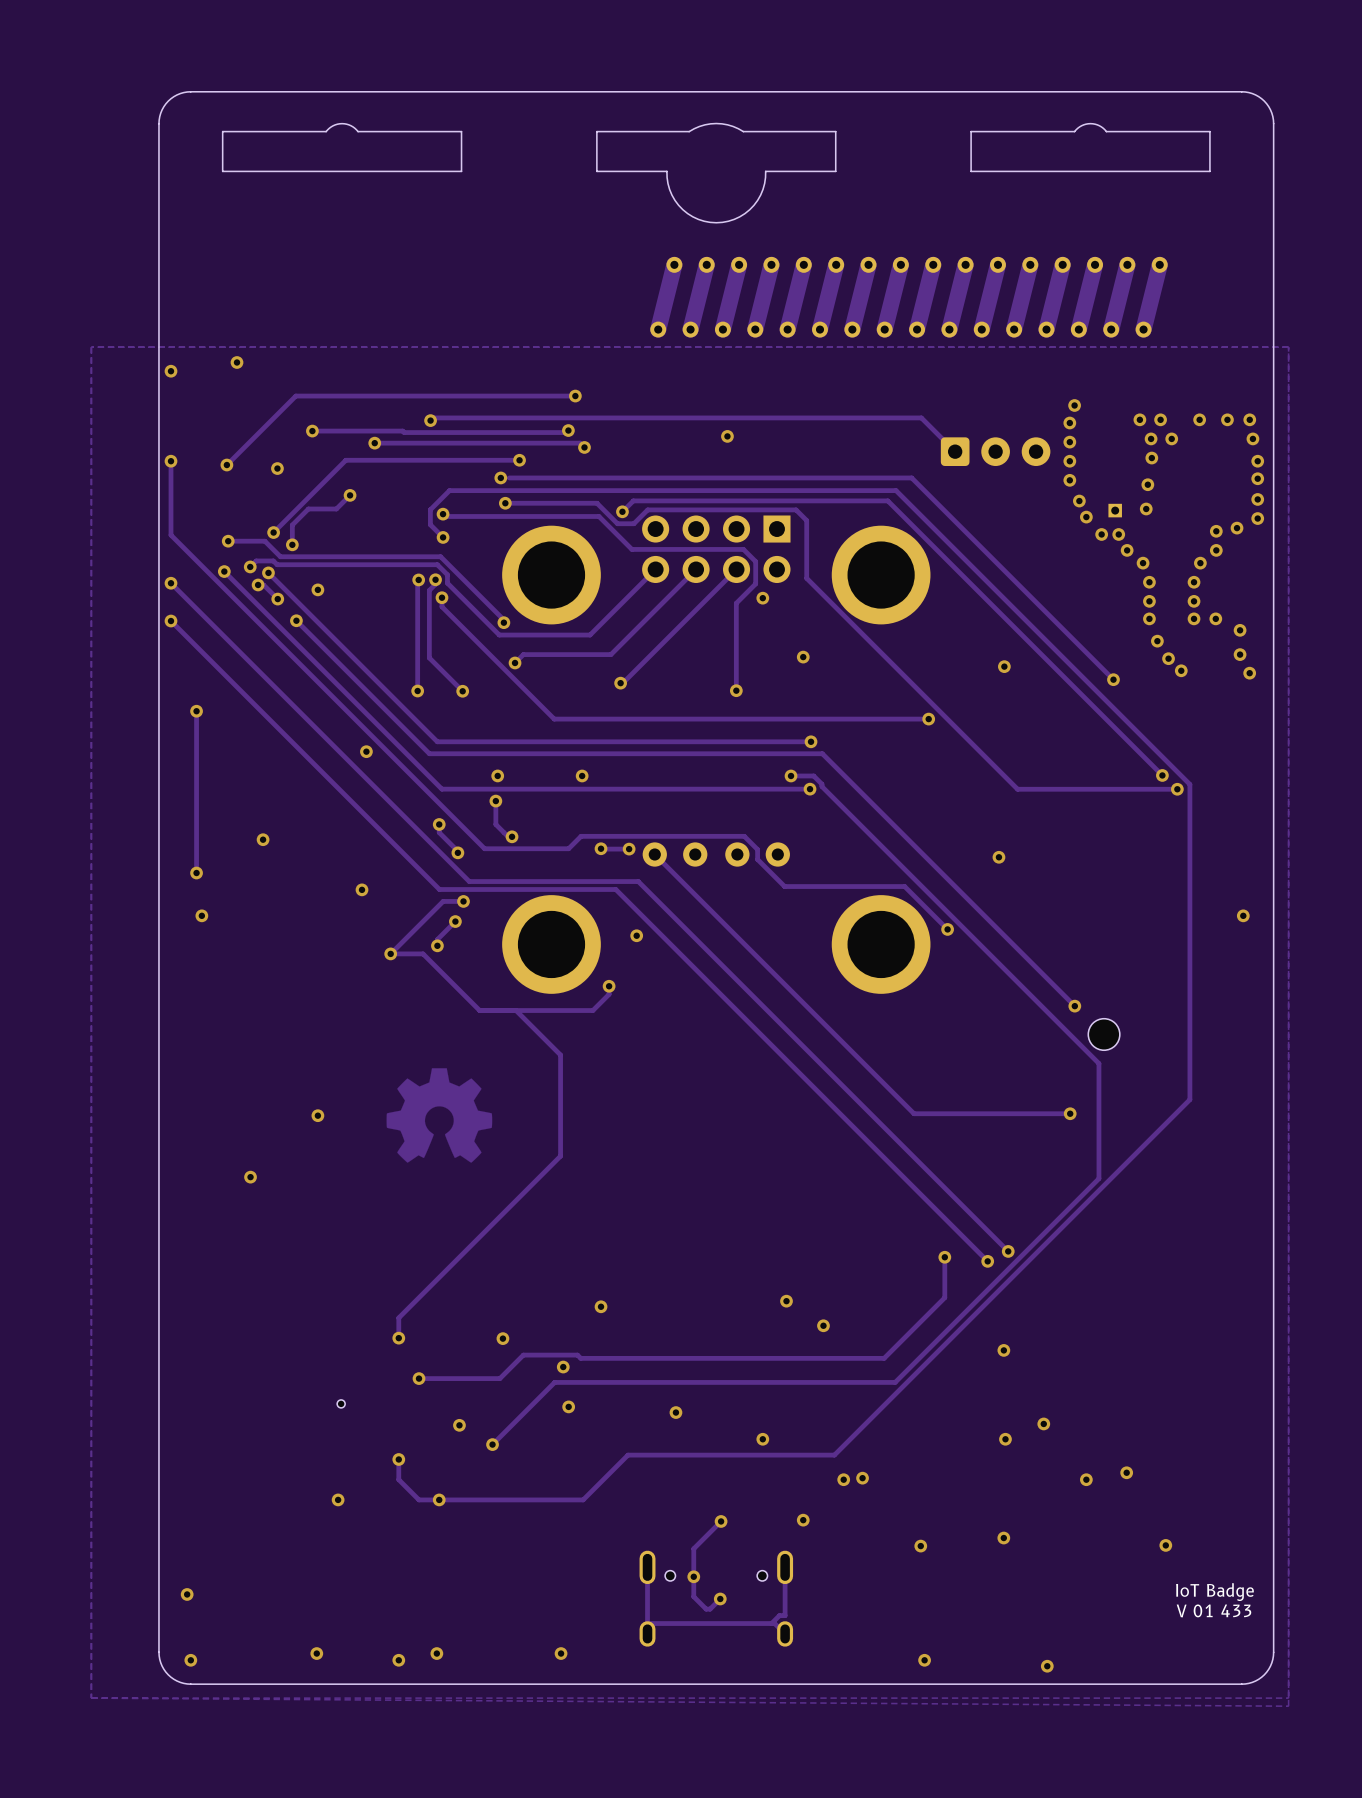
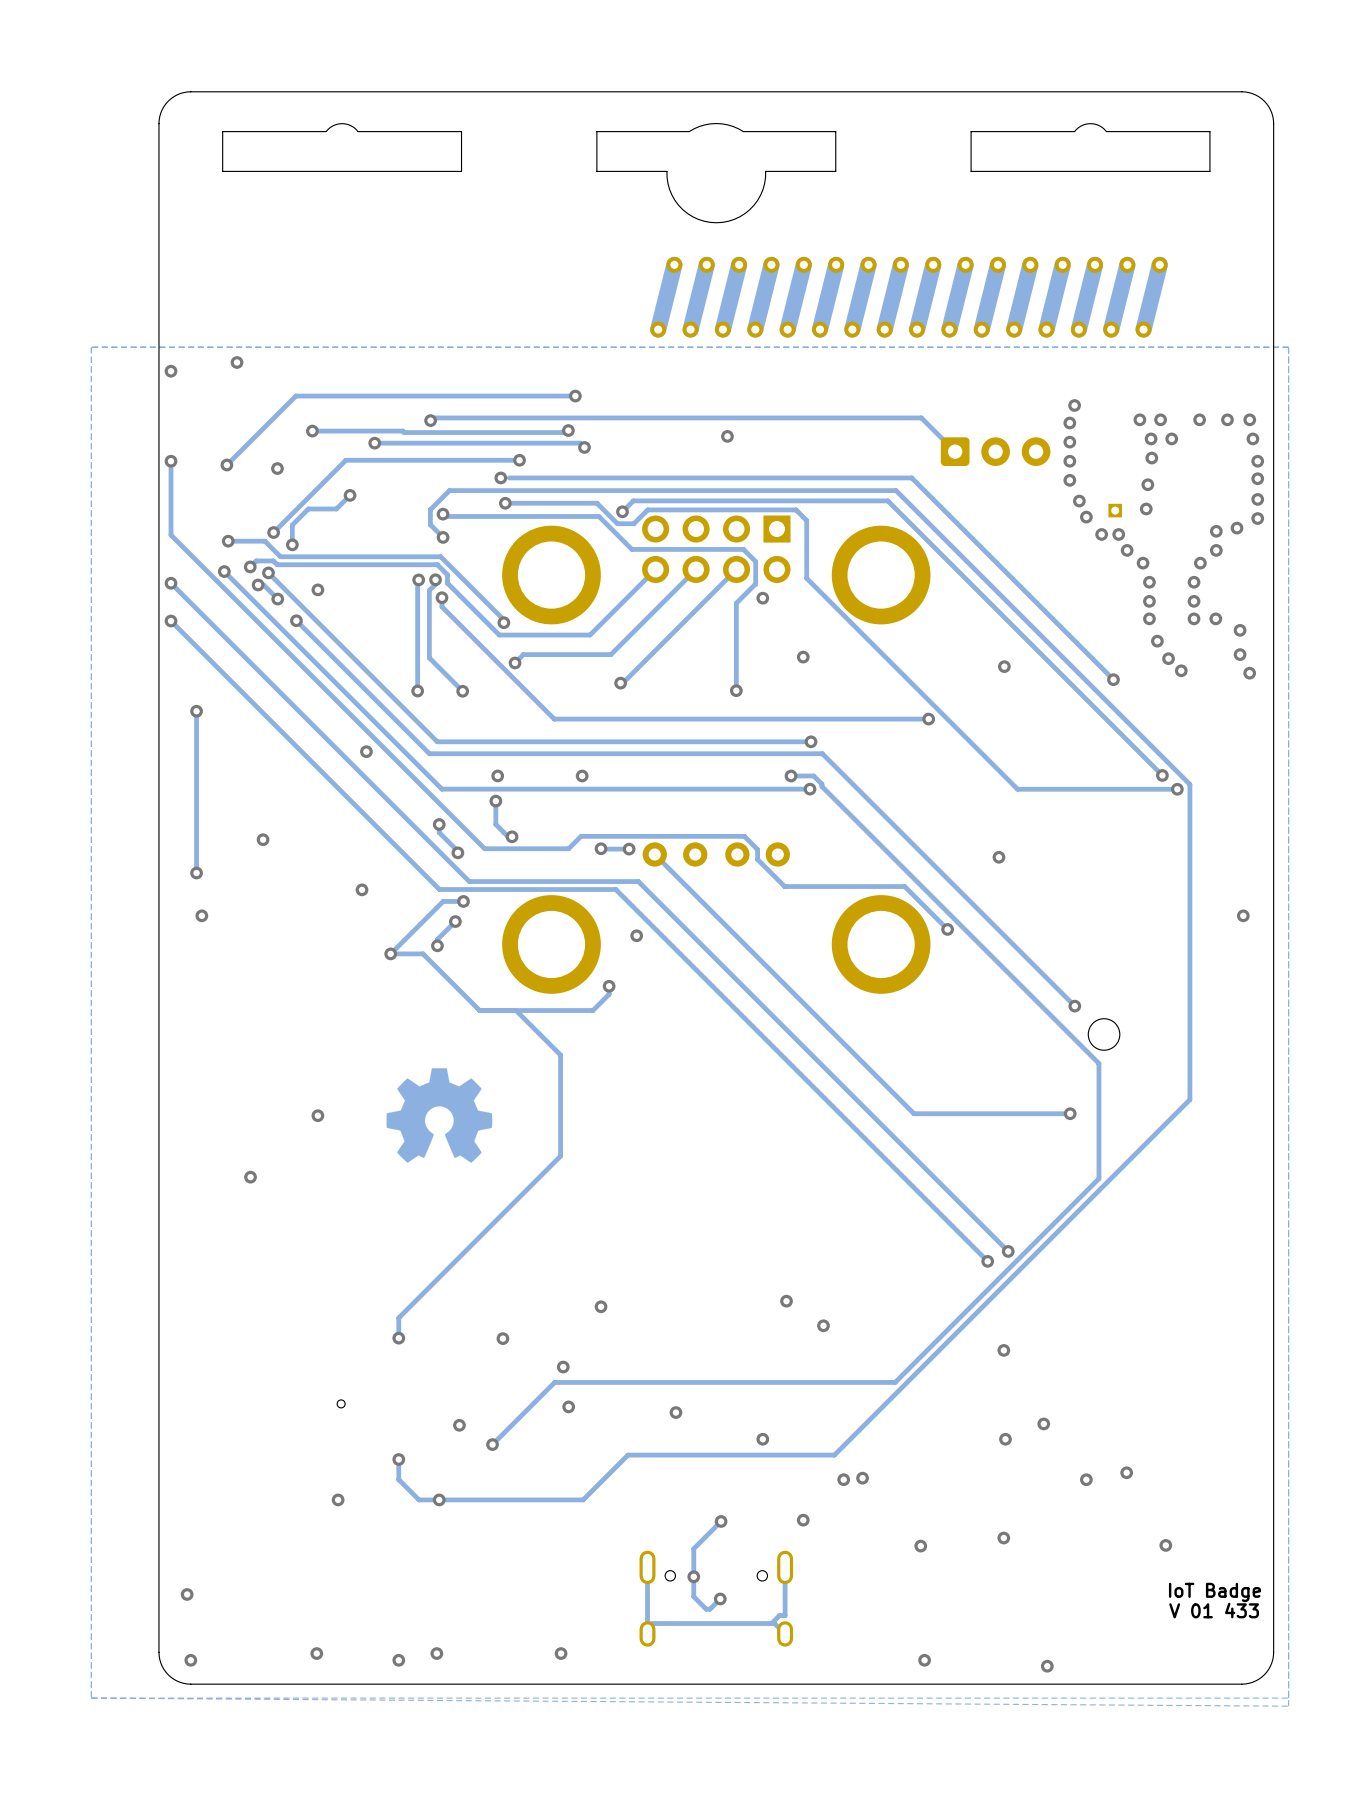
track: (944, 1257) (944, 1297) (884, 1358) (580, 1358) (577, 1355) (523, 1355) (499, 1378) (419, 1378) -> none
via: (944, 1257) -> none
via: (419, 1378) -> none

